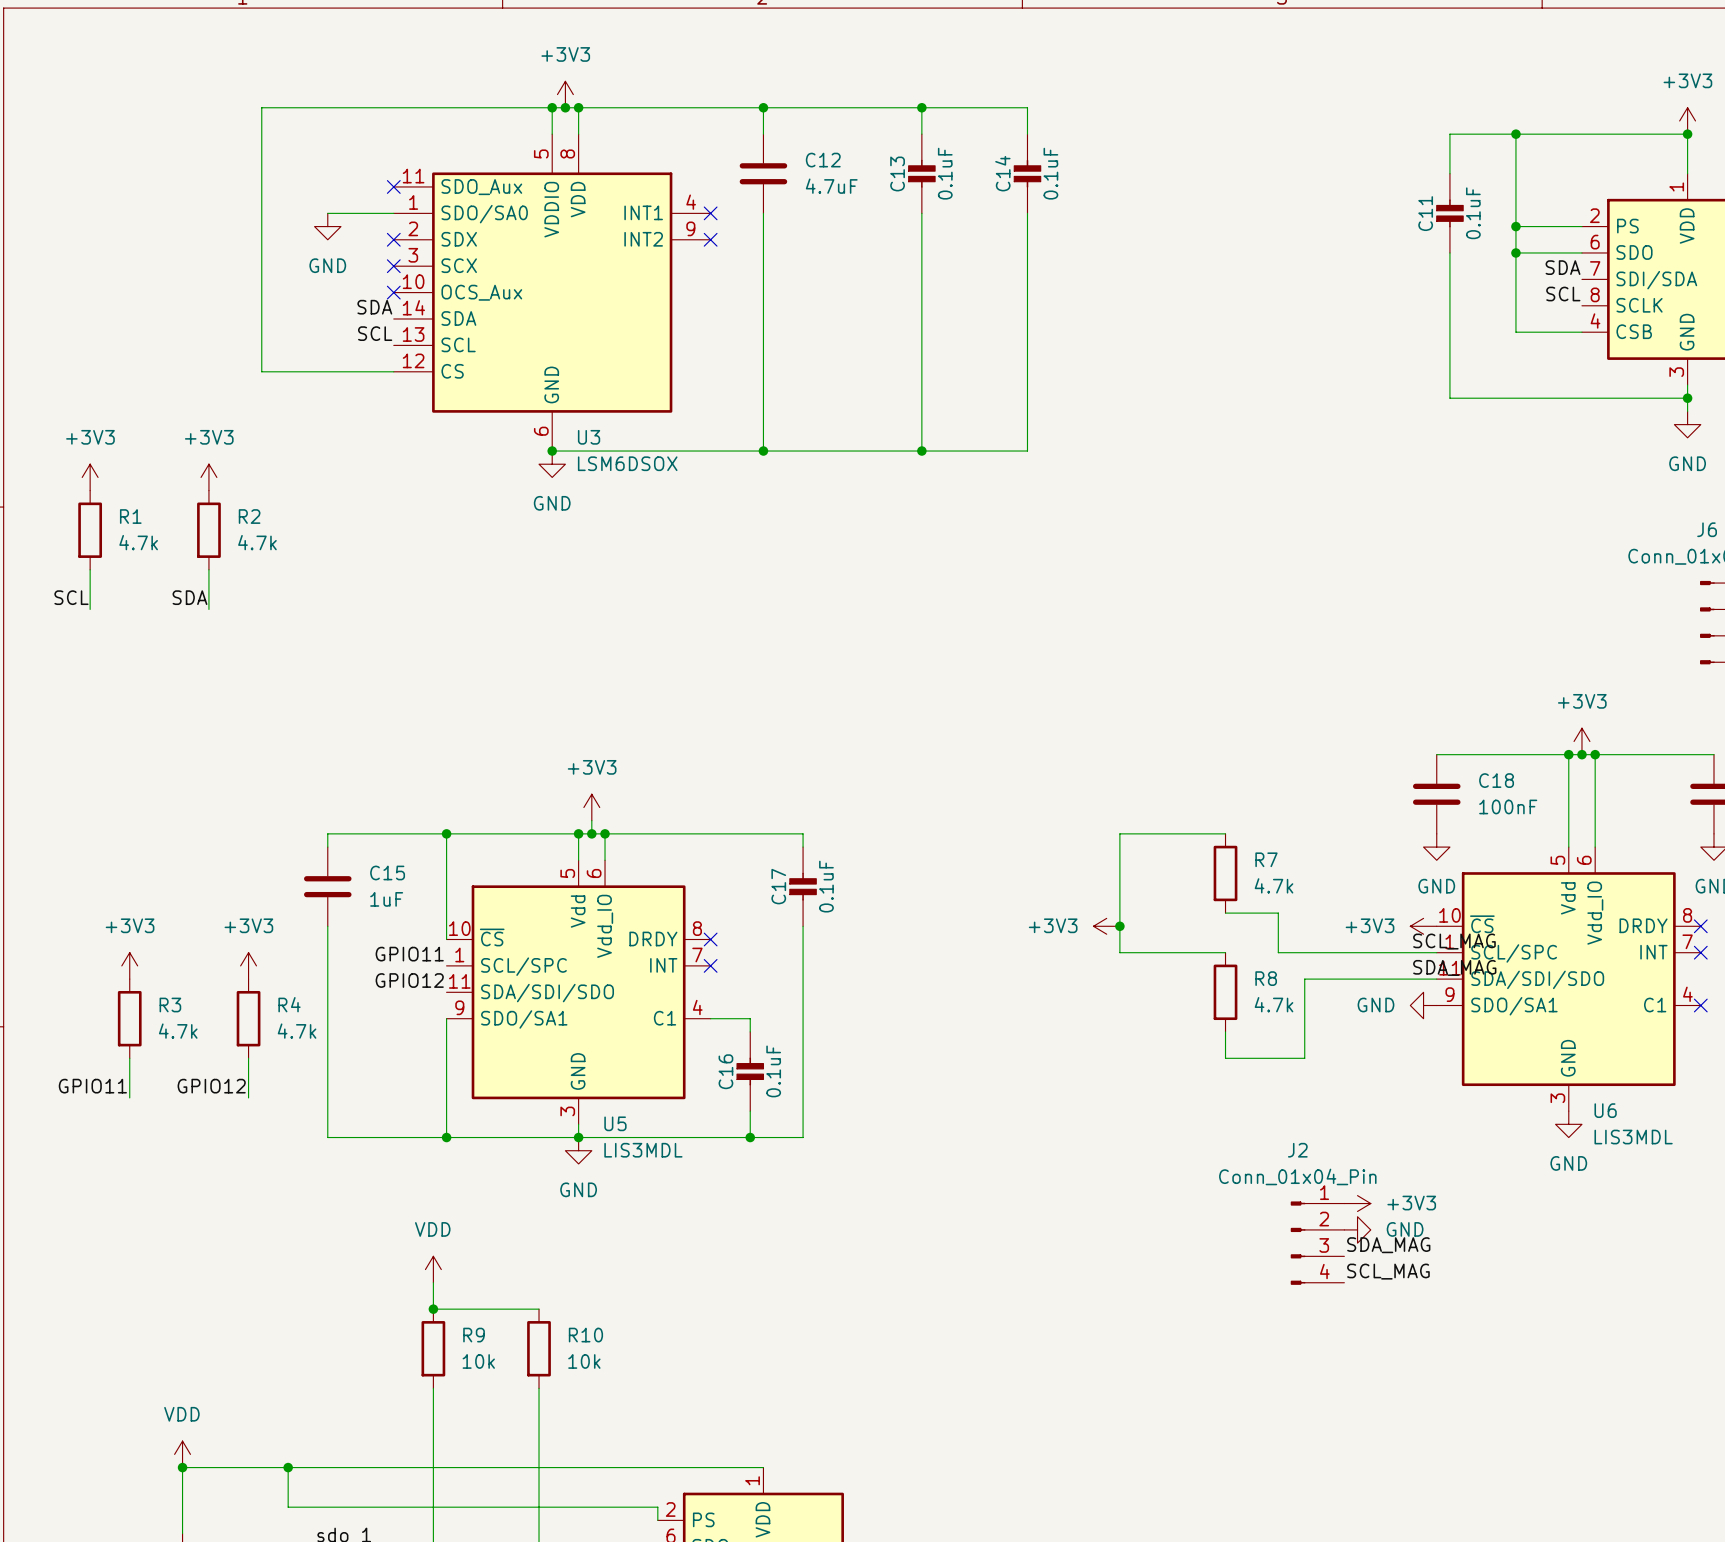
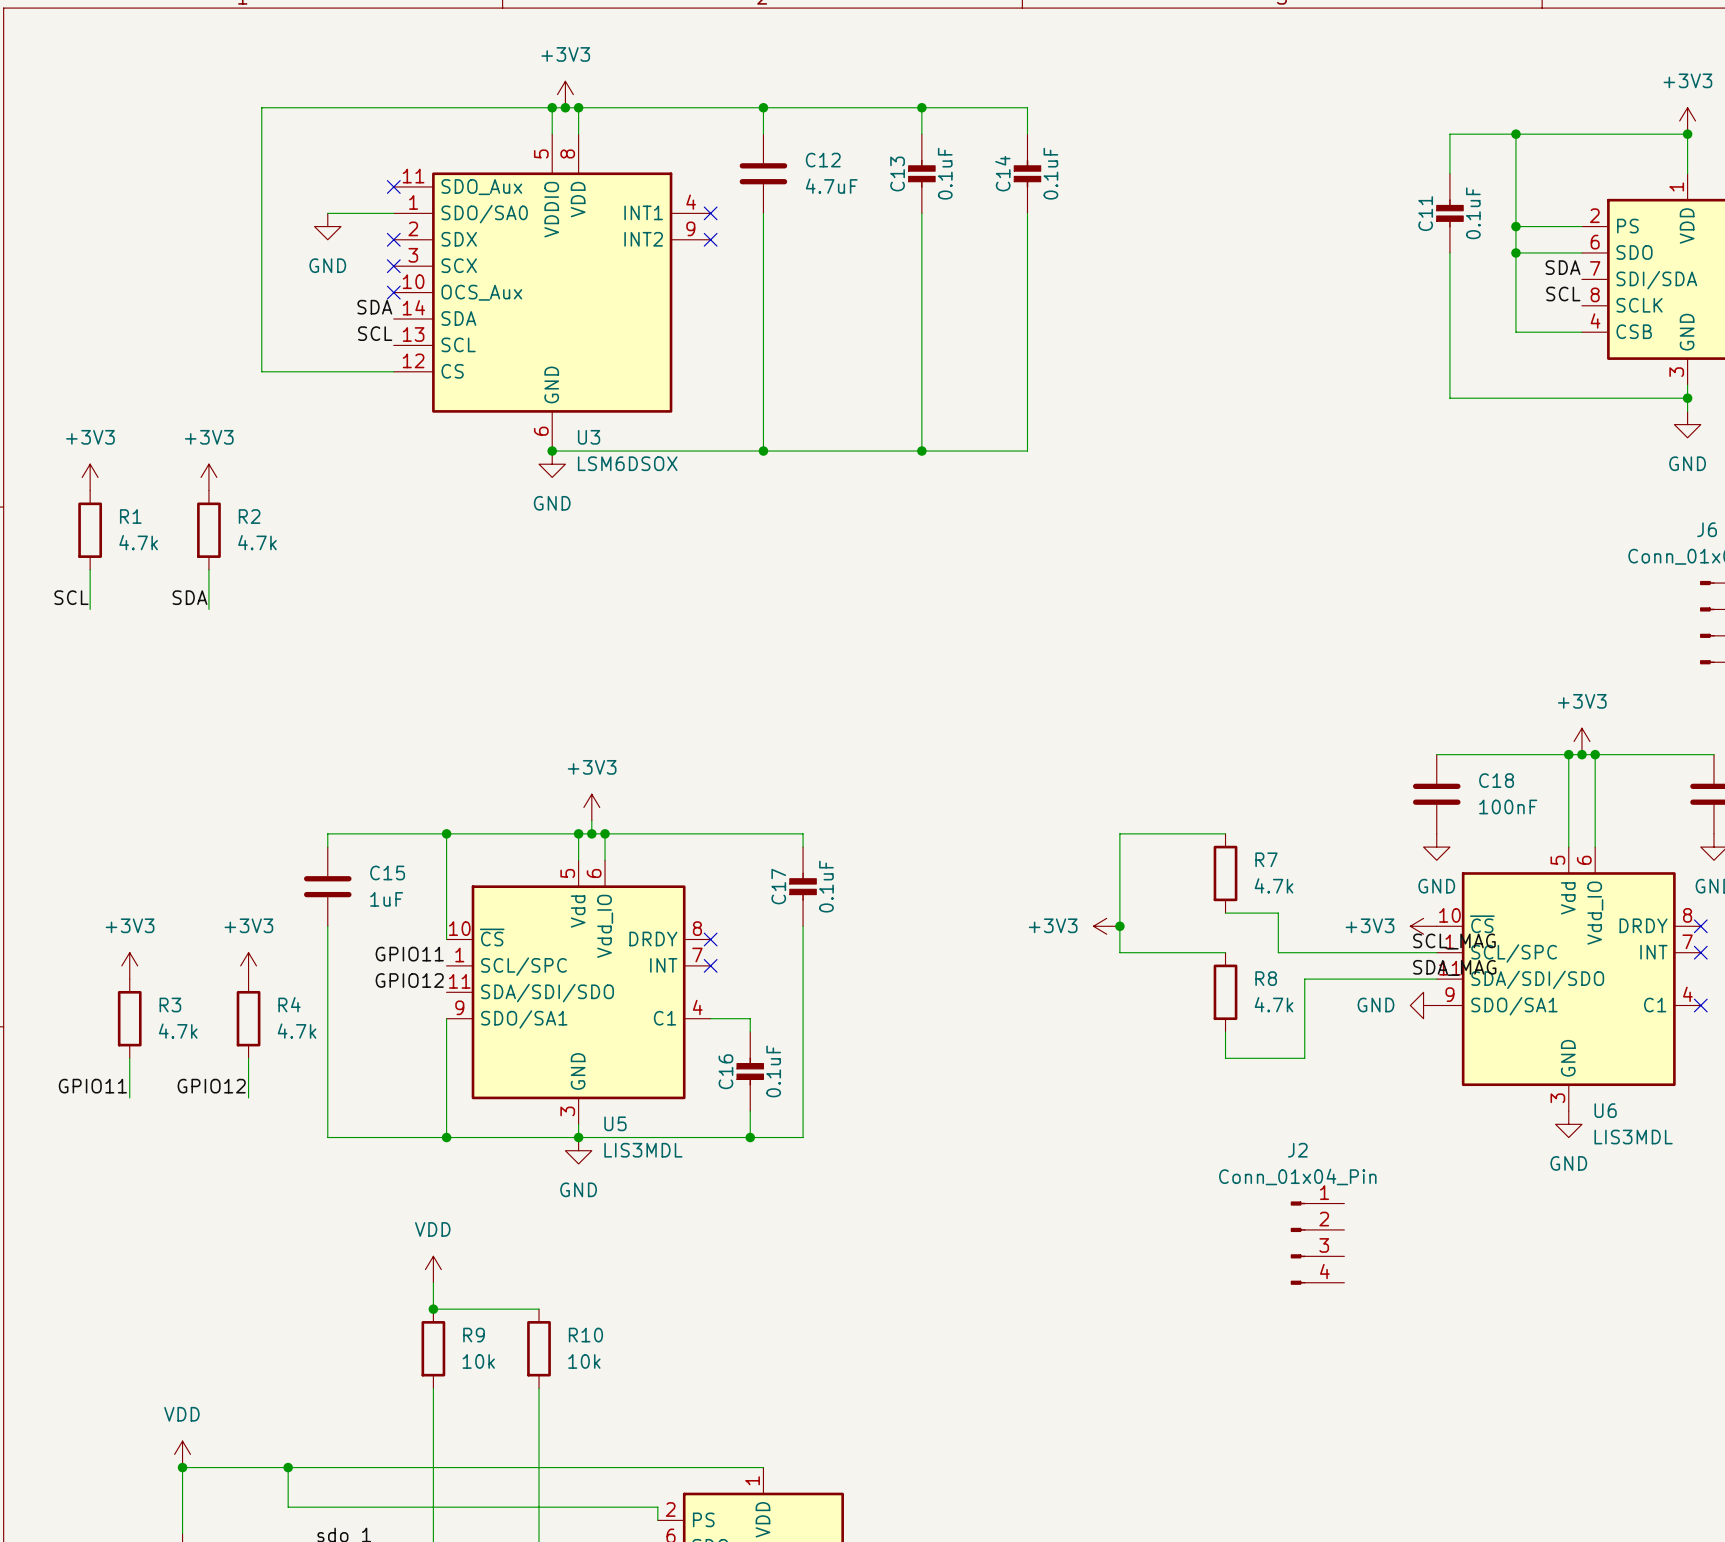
power symbol: +3V3 (1357, 1203) -> none
power symbol: GND (1357, 1229) -> none
label: SDA_MAG (1388, 1245) -> none
label: SCL_MAG (1388, 1271) -> none

